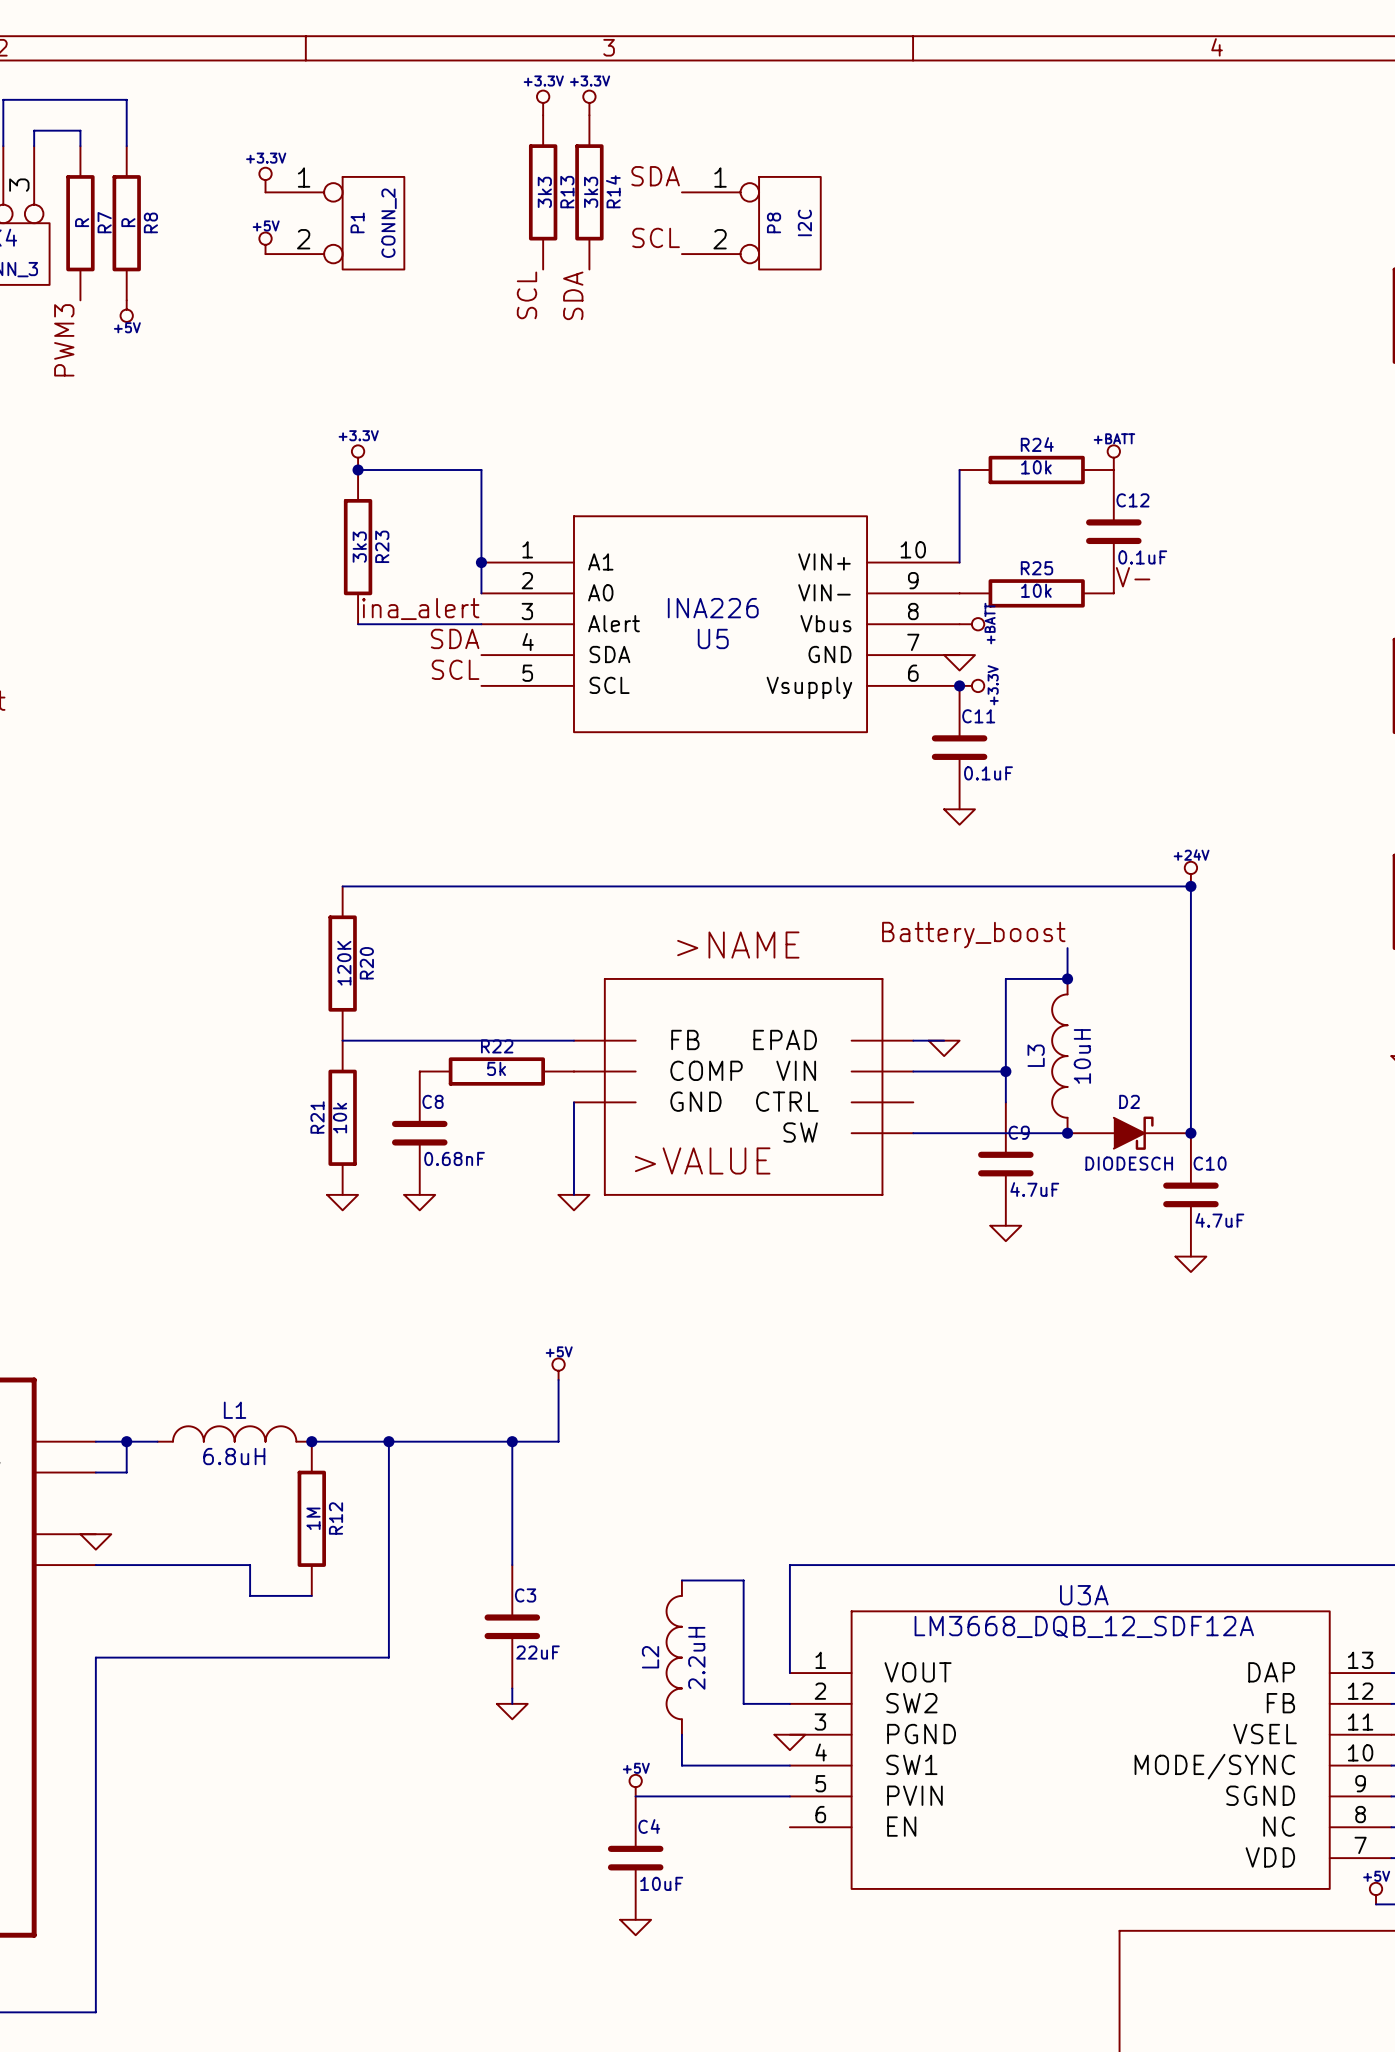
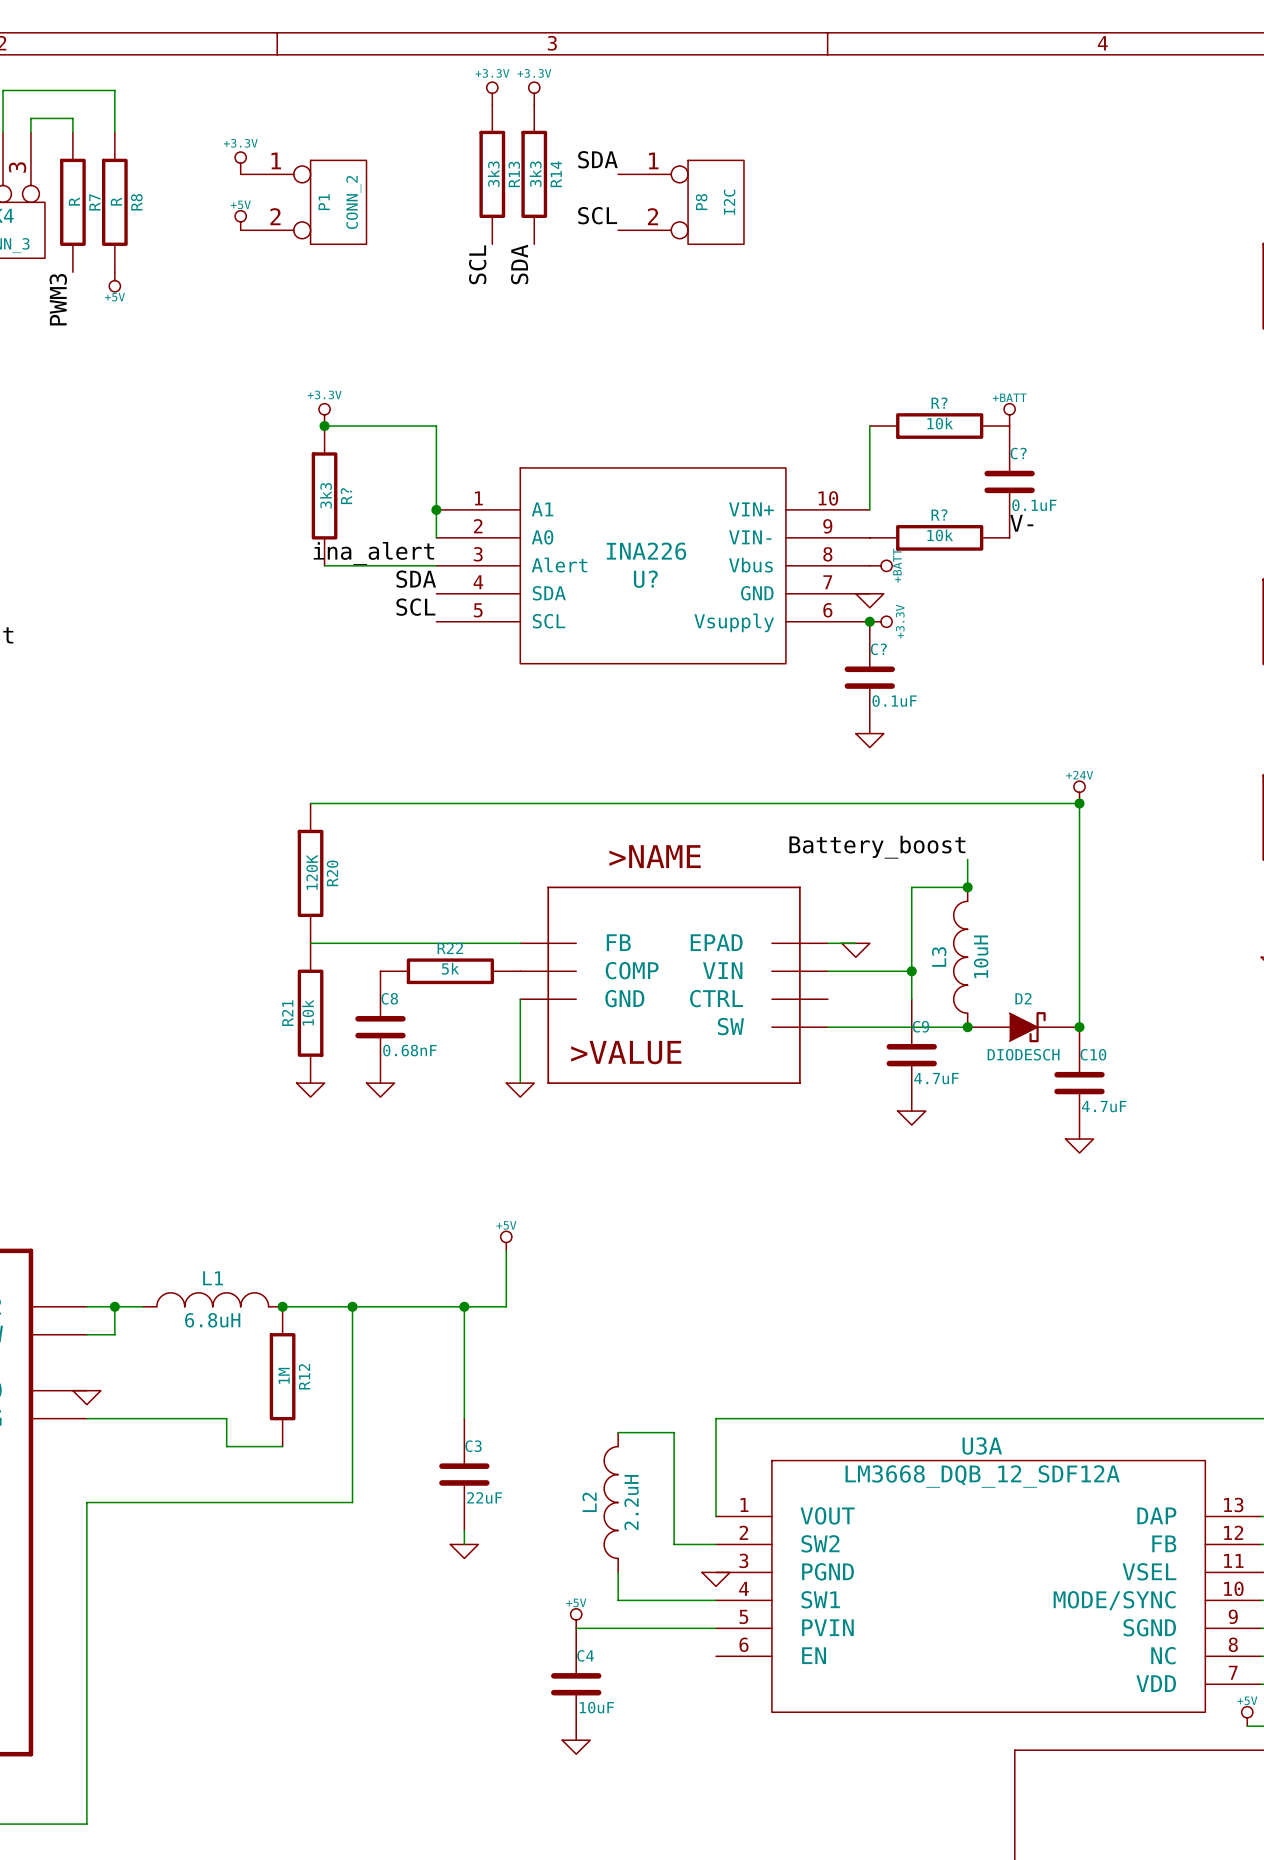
R24 name: R24 (1037, 444) -> R? (939, 403)
C12 name: C12 (1132, 500) -> C? (1018, 453)
R23 name: R23 (382, 546) -> R? (346, 496)
R25 name: R25 (1036, 568) -> R? (939, 514)
U5 name: U5 (713, 638) -> U? (645, 579)
C11 name: C11 (978, 716) -> C? (878, 649)

